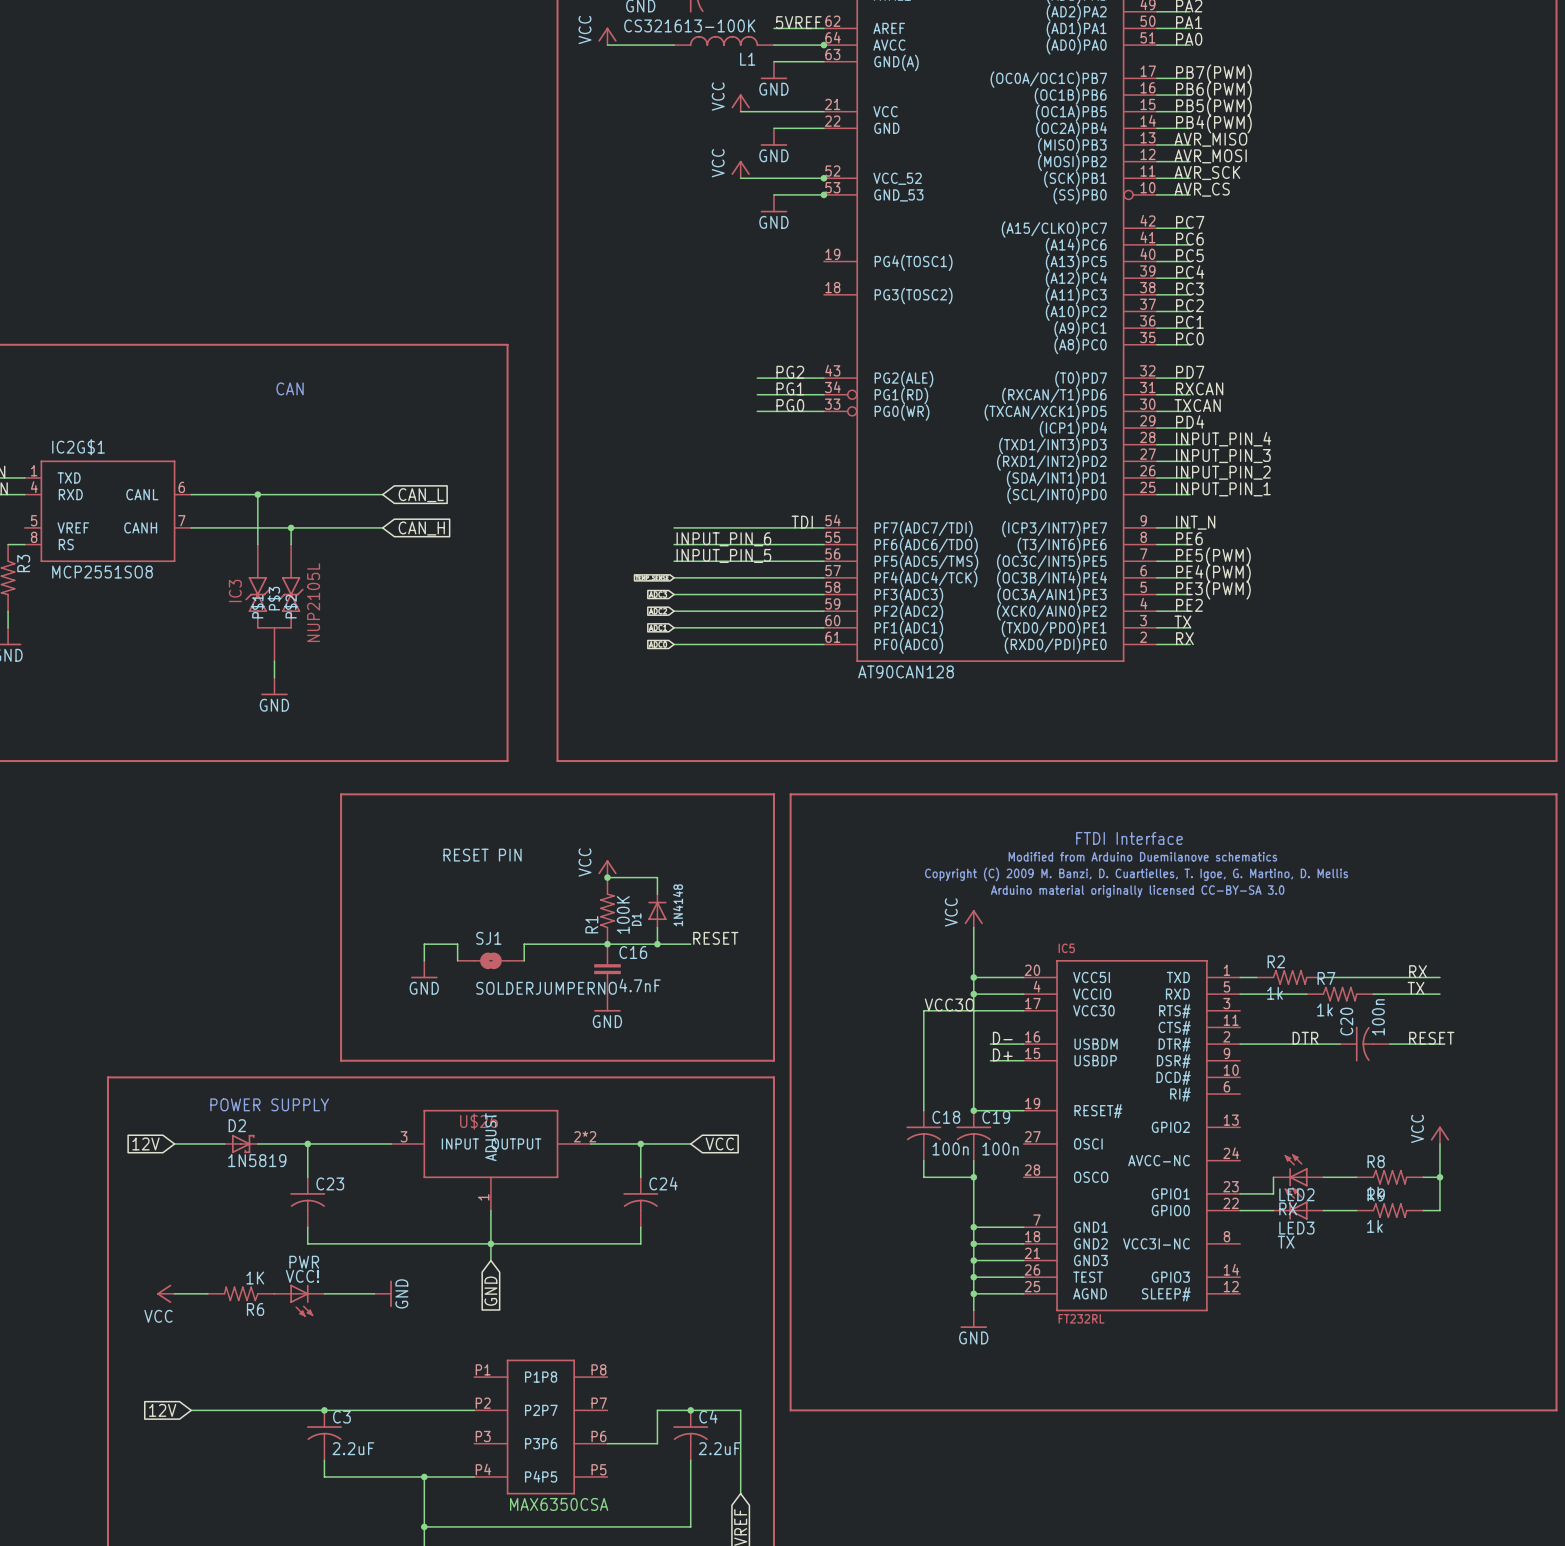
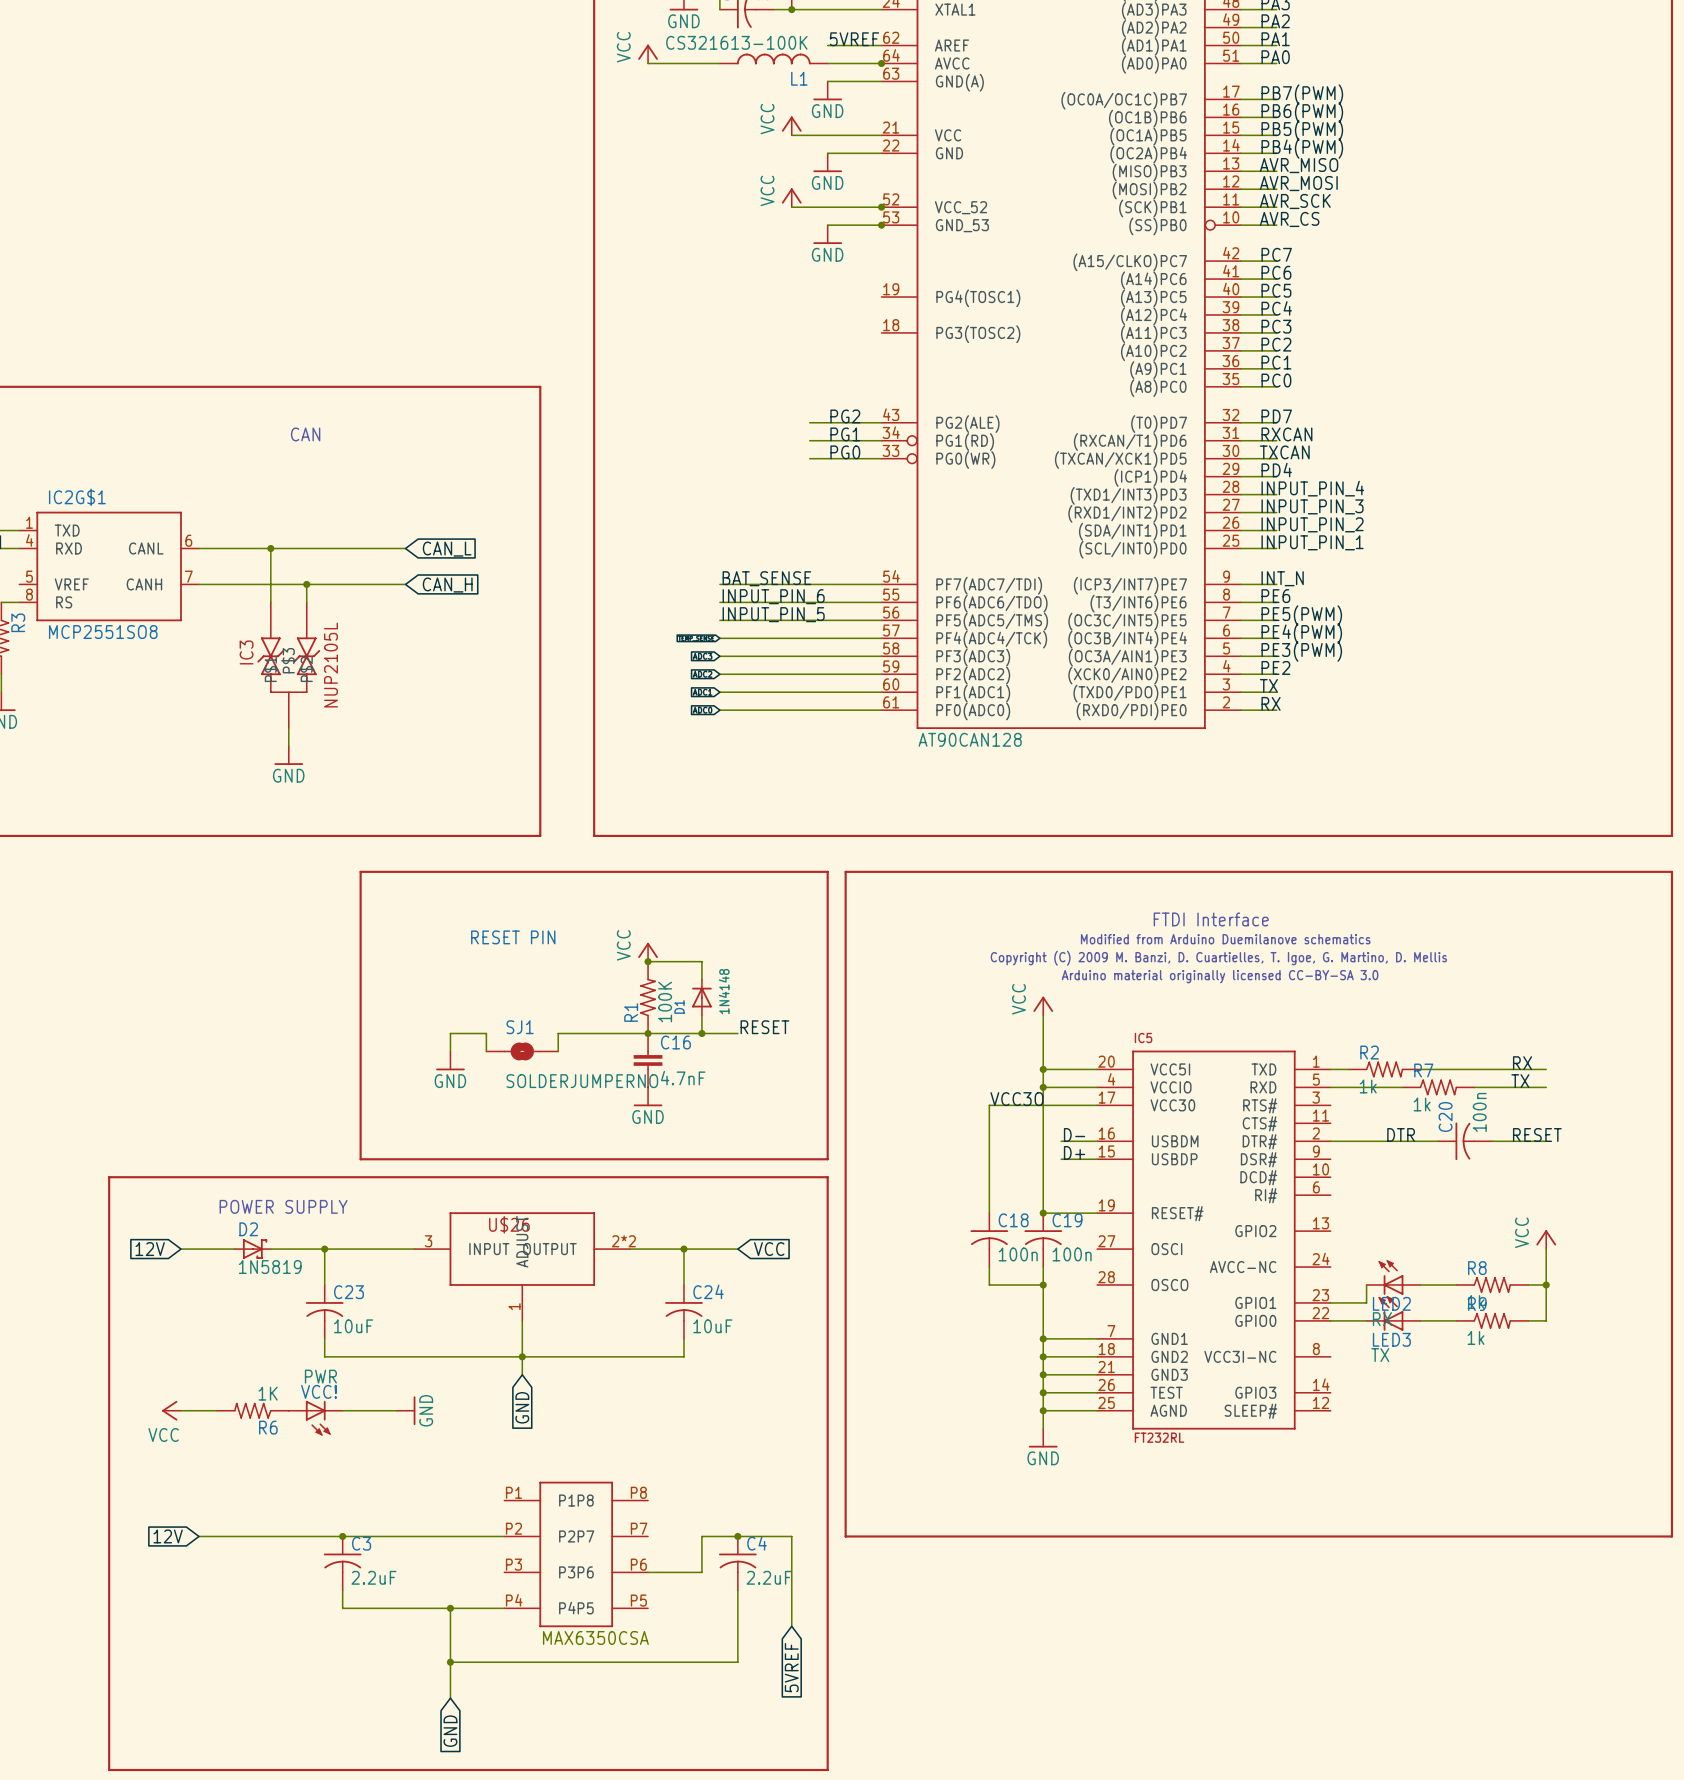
label: none -> BAT_SENSE (766, 578)
label: TDI (802, 522) -> none
C23 value: none -> 10uF (353, 1326)
C24 value: none -> 10uF (712, 1326)

